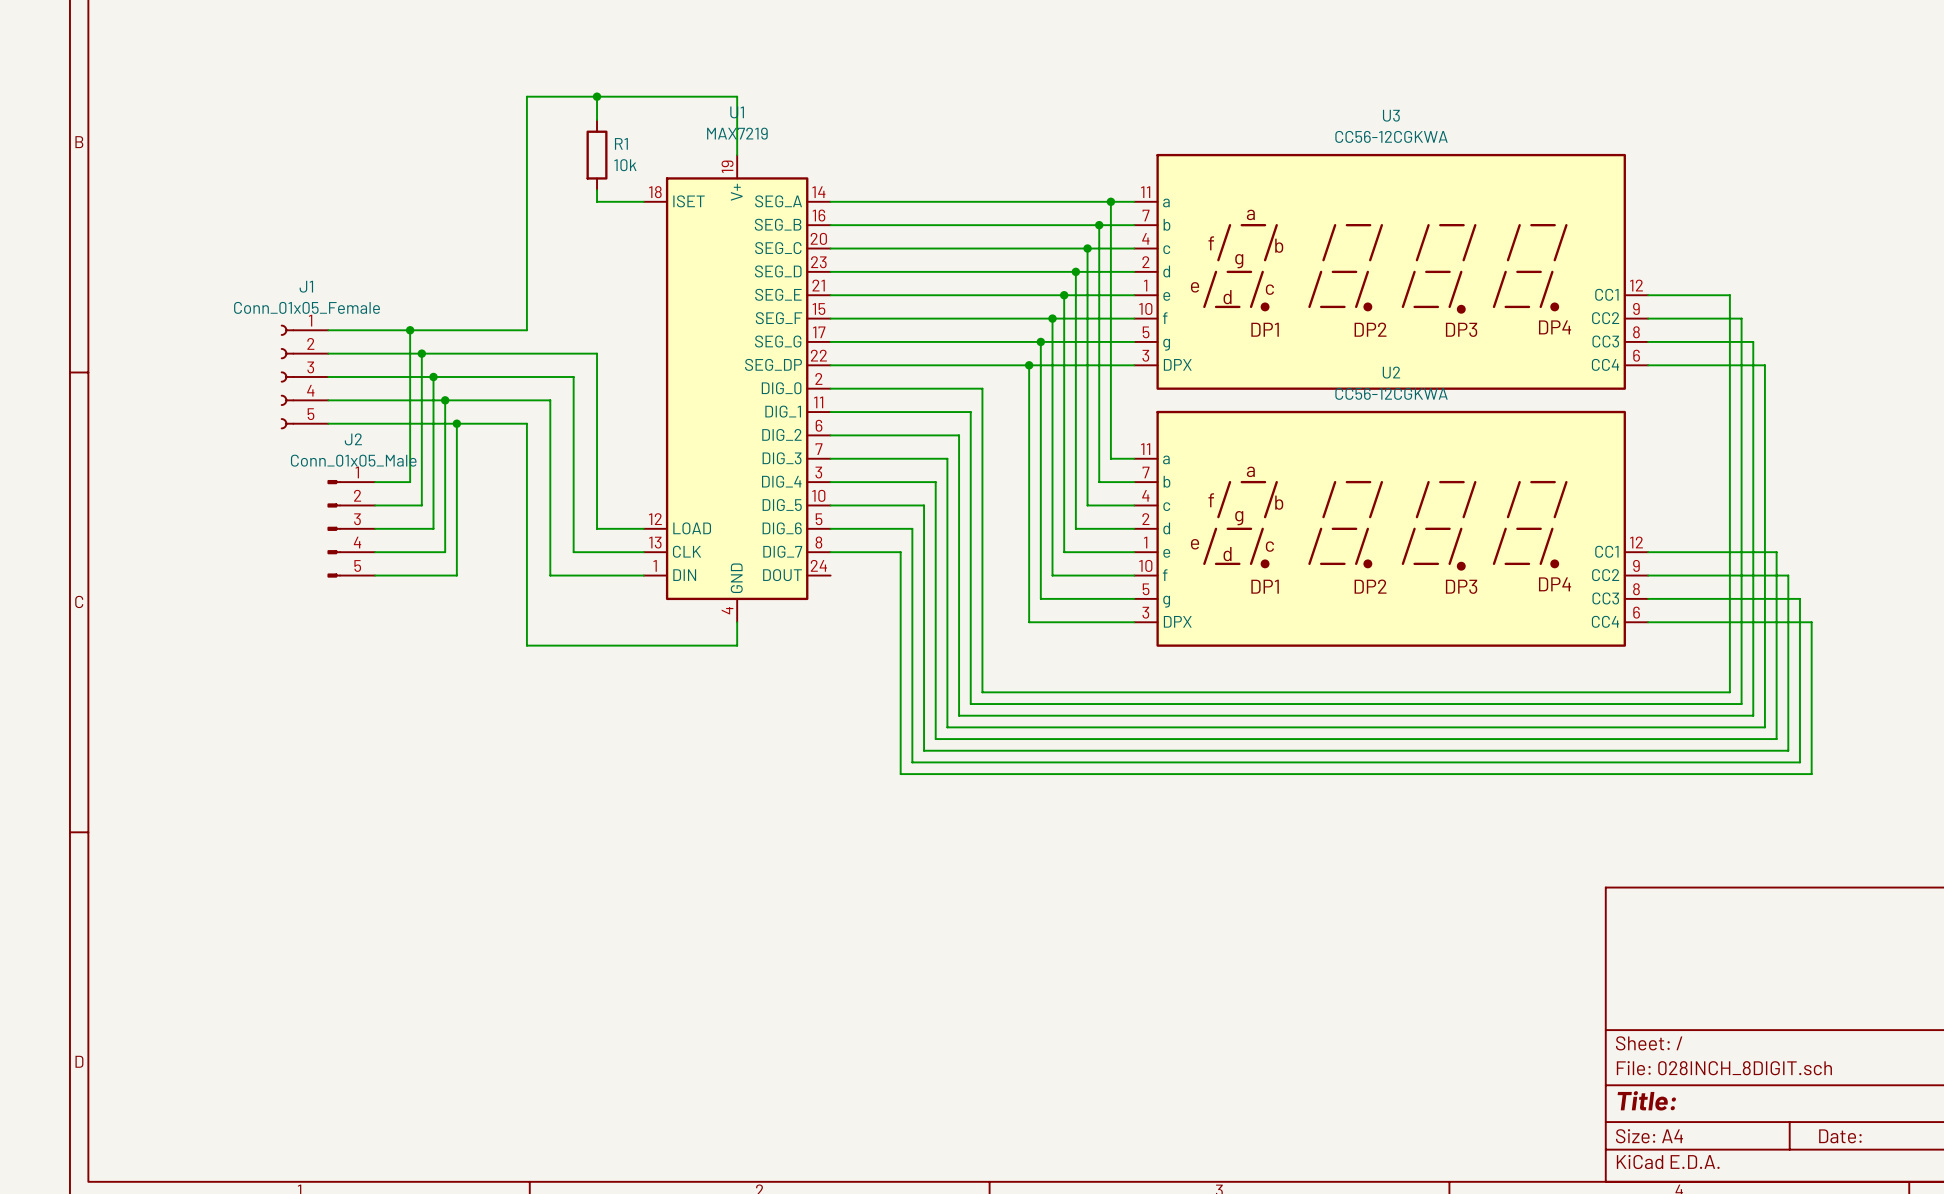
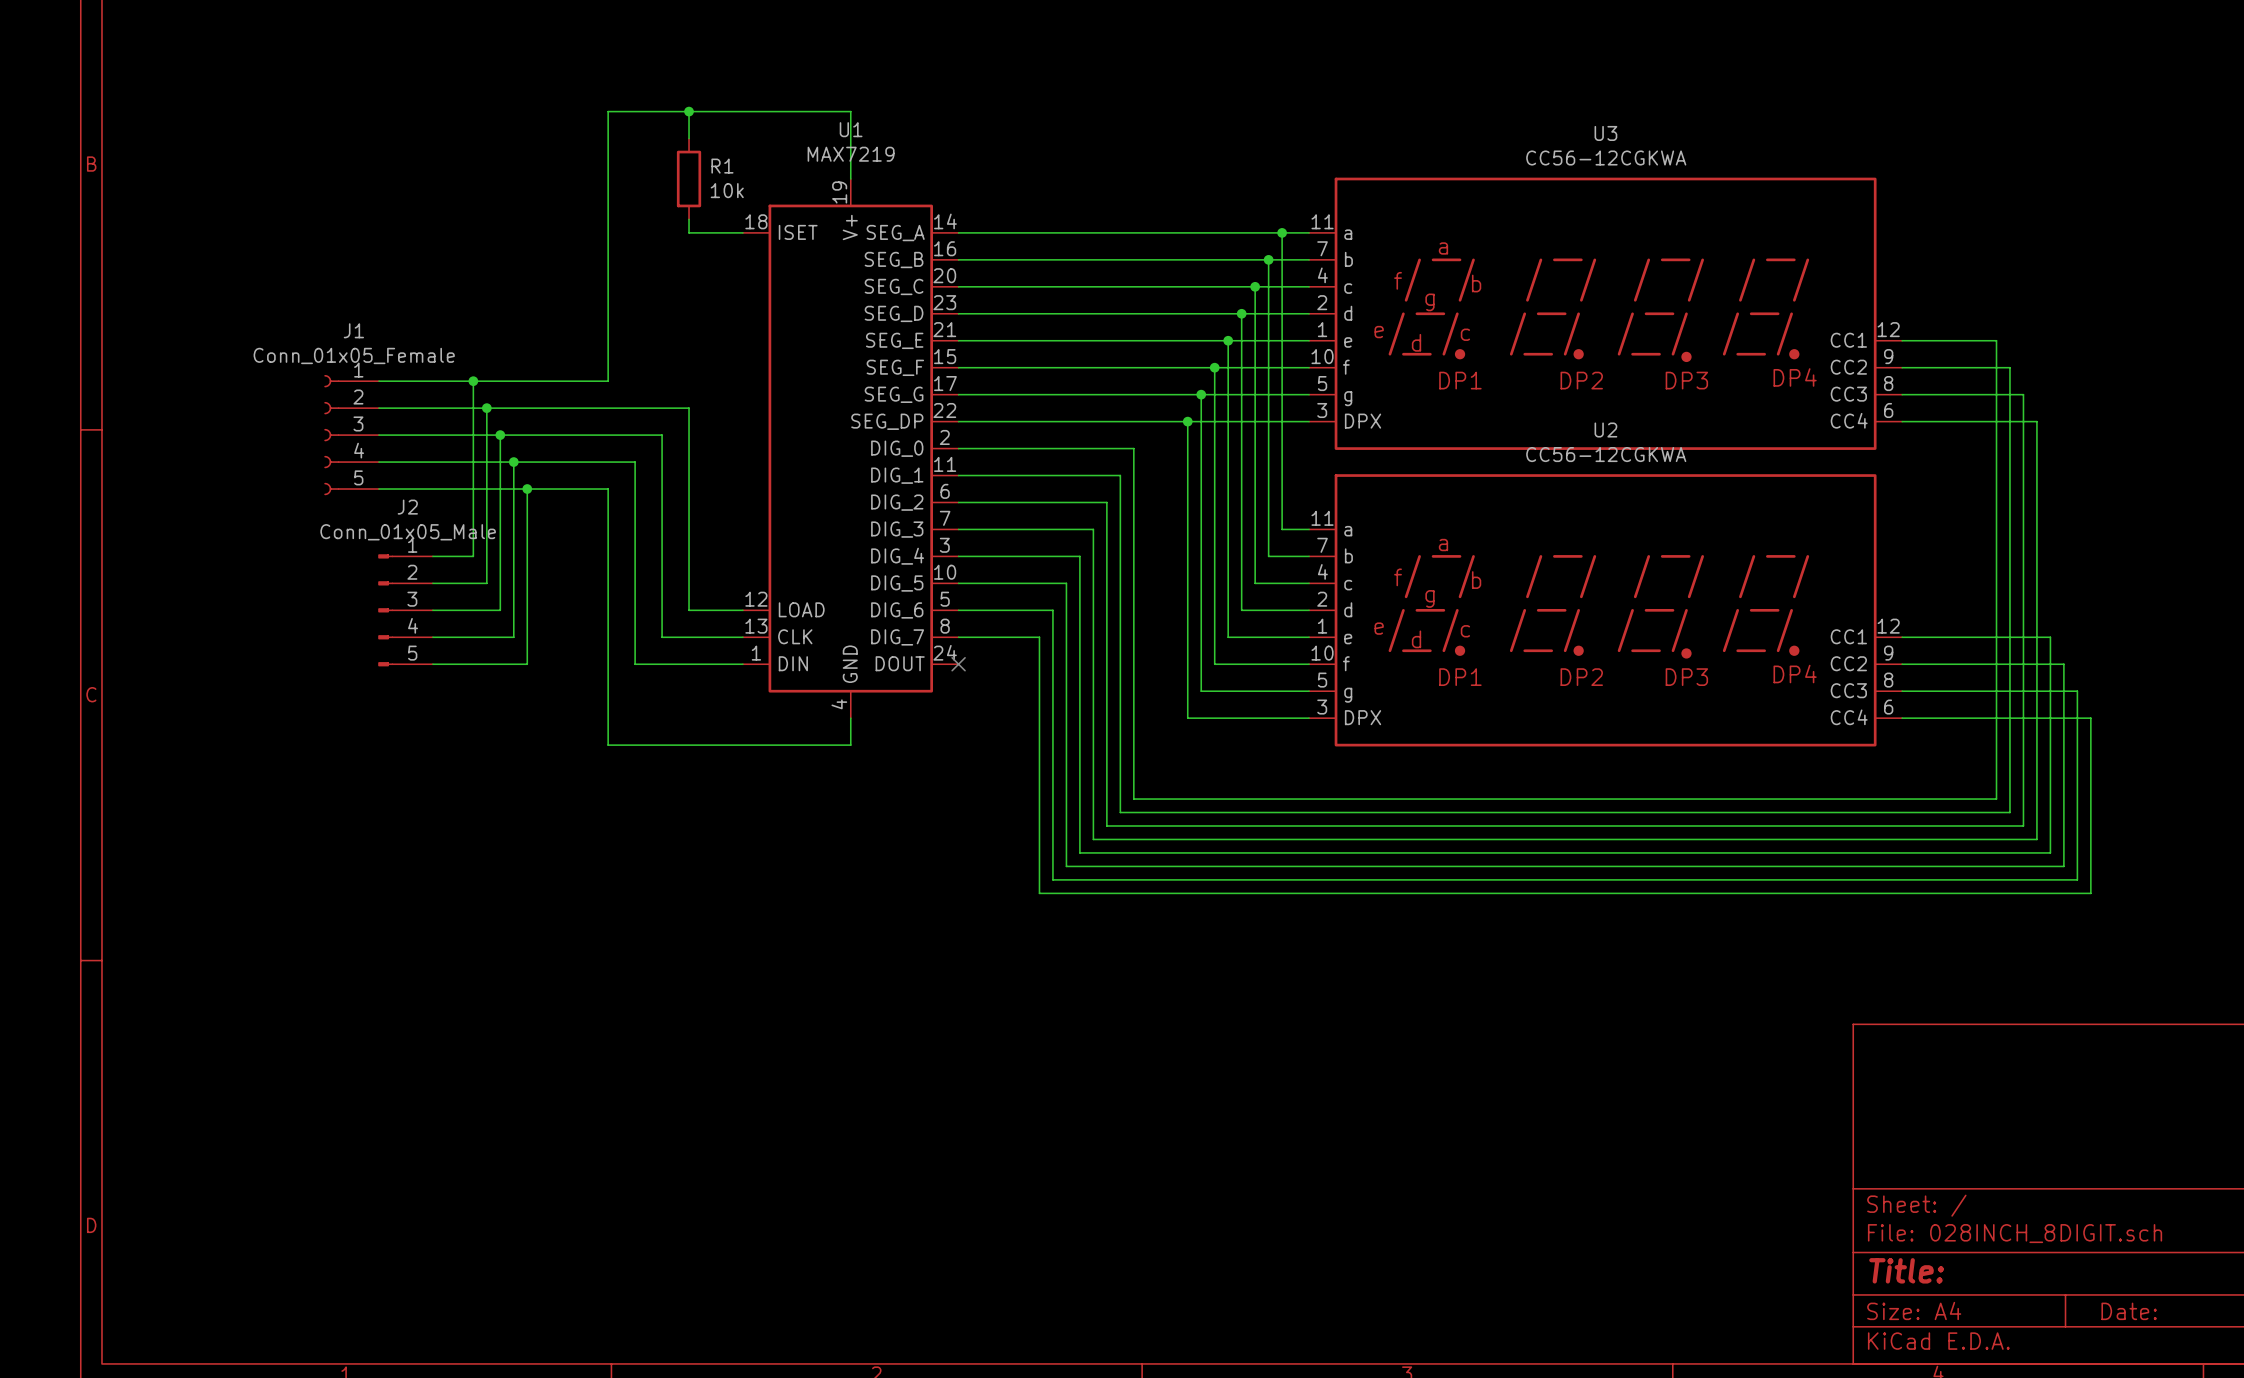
no-connect mark: none -> (958, 664)

